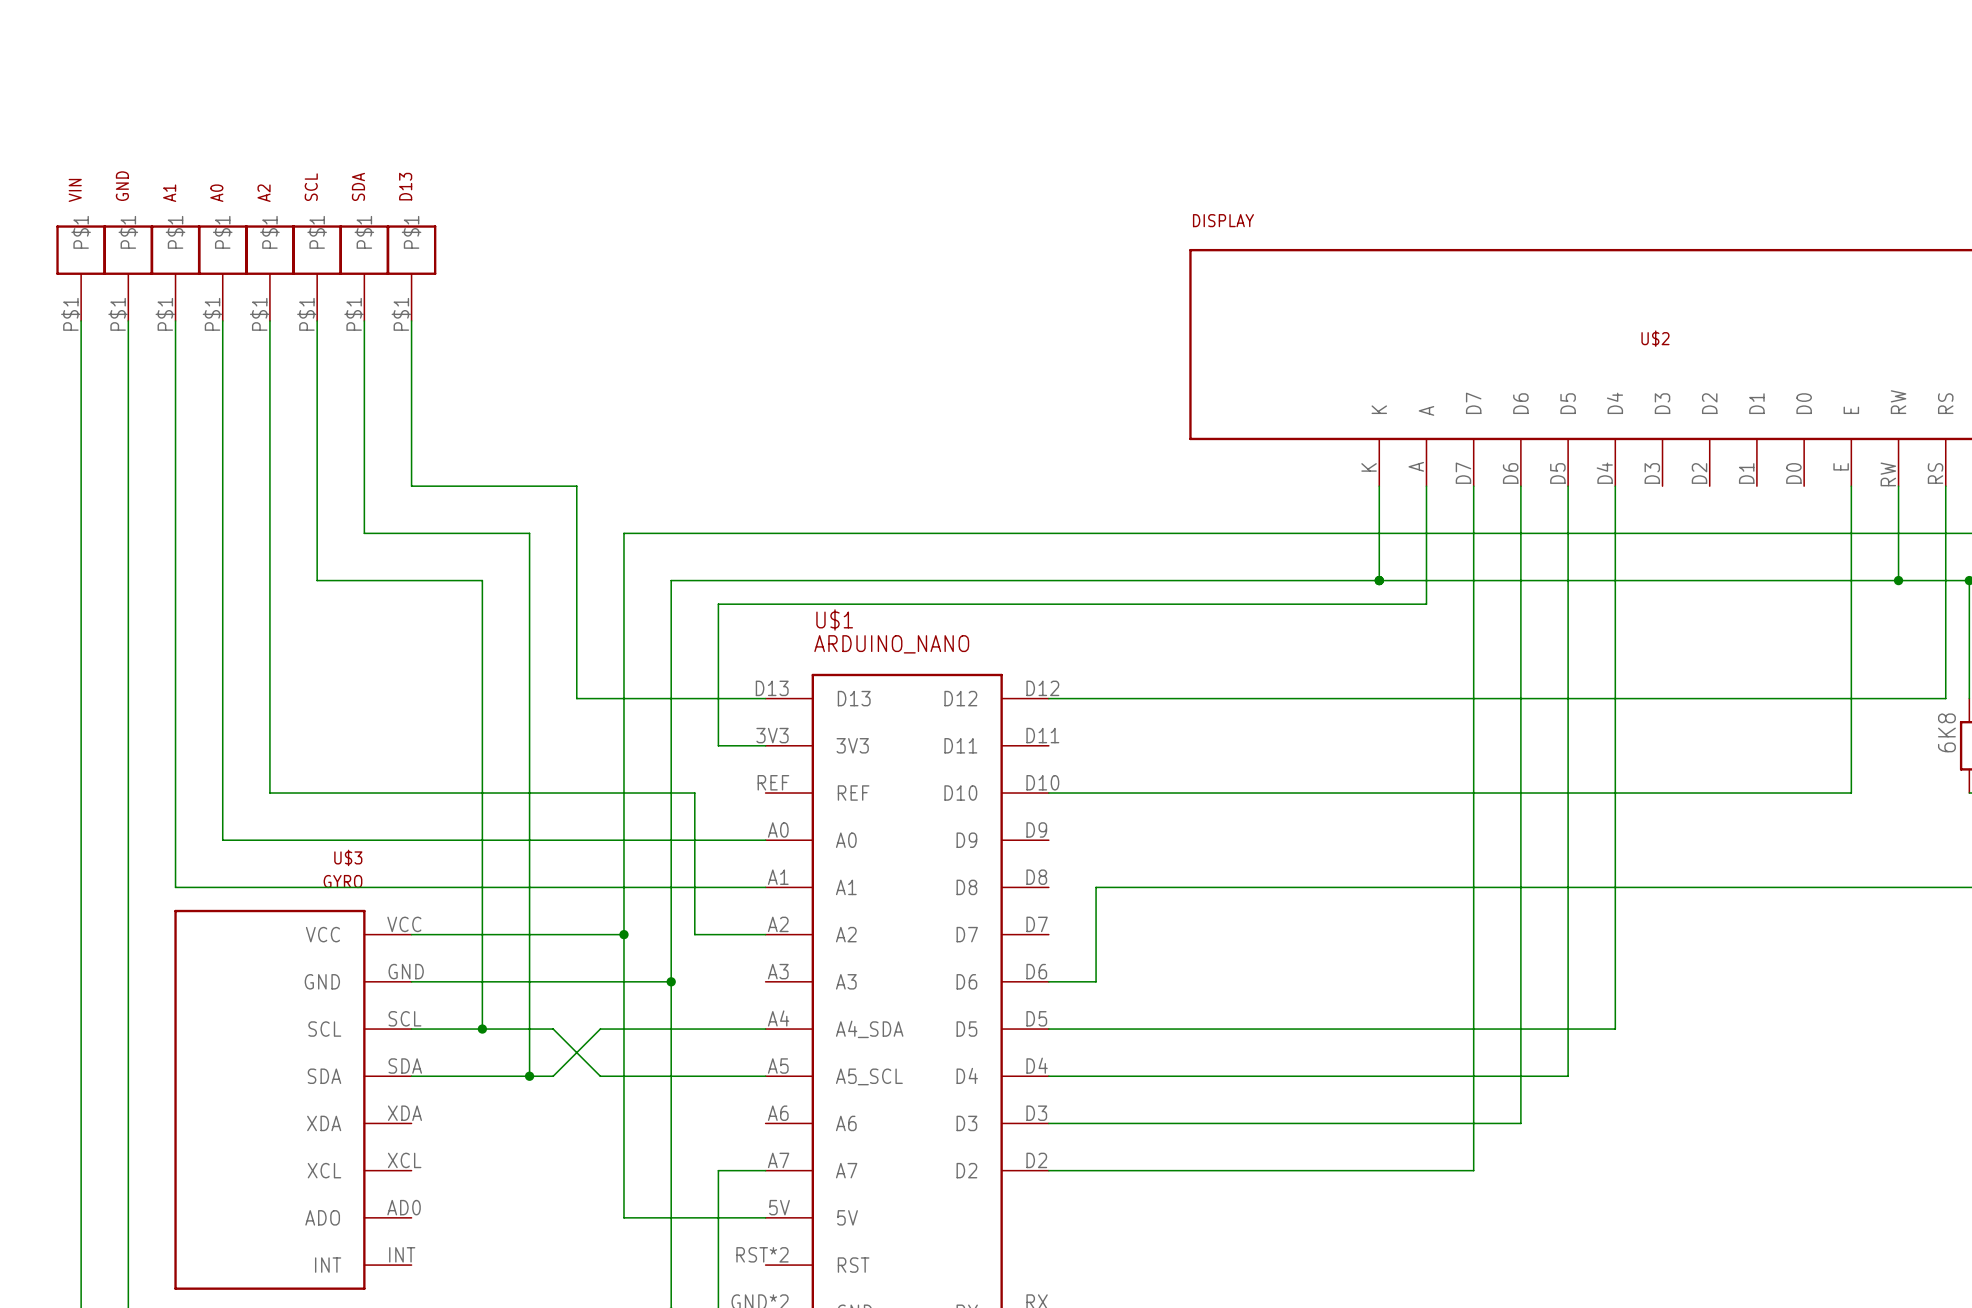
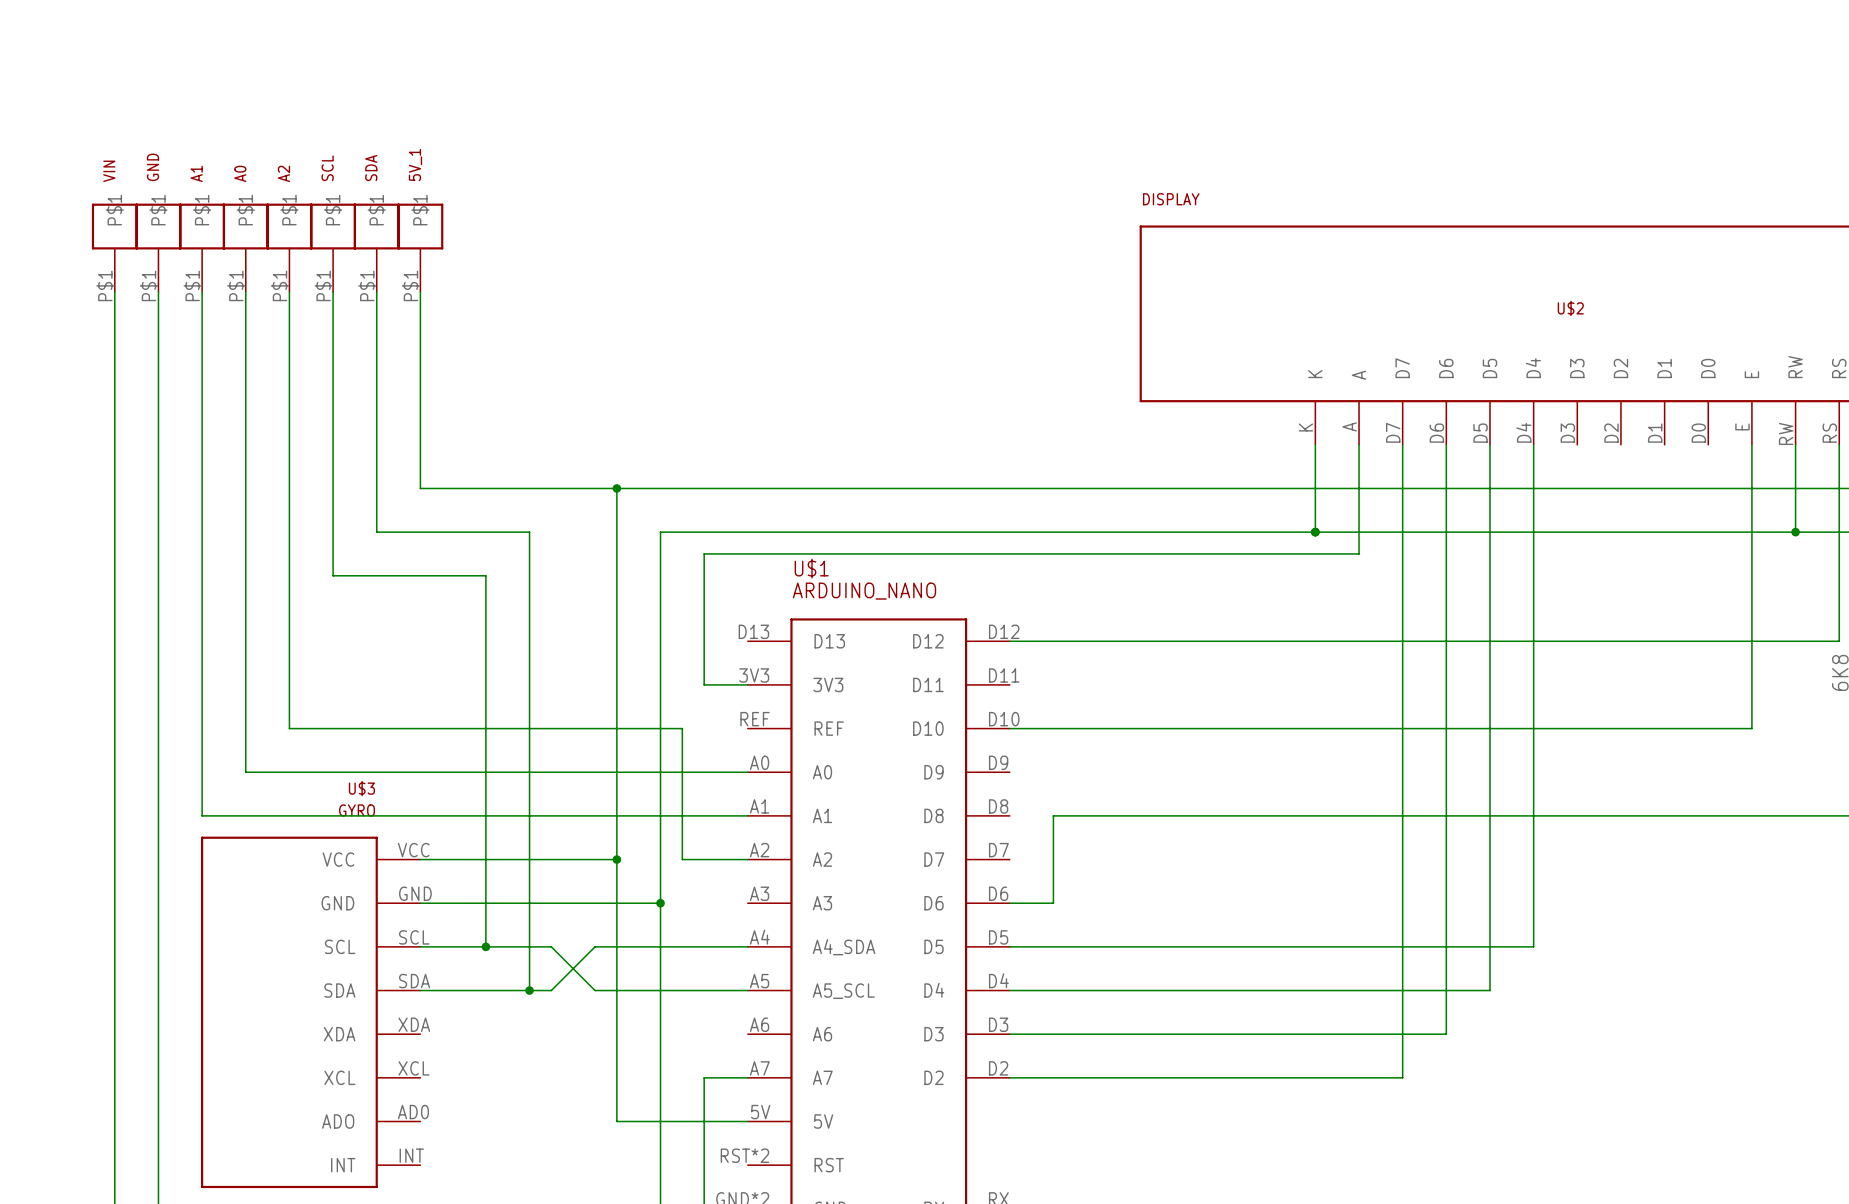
D13 name: D13 (405, 186) -> 5V_1 (415, 165)
wire: (411, 486) (576, 486) (576, 698) (765, 698) -> (420, 444) (420, 488)
wire: (364, 533) (411, 533) -> (376, 488) (376, 532)
wire: (529, 533) (529, 580) -> (485, 532) (529, 532)
wire: none -> (529, 488) (616, 488)
junction: none -> (616, 488)
wire: (317, 580) (364, 580) -> (333, 532) (333, 575) (485, 575)
wire: (482, 580) (482, 627) -> none

